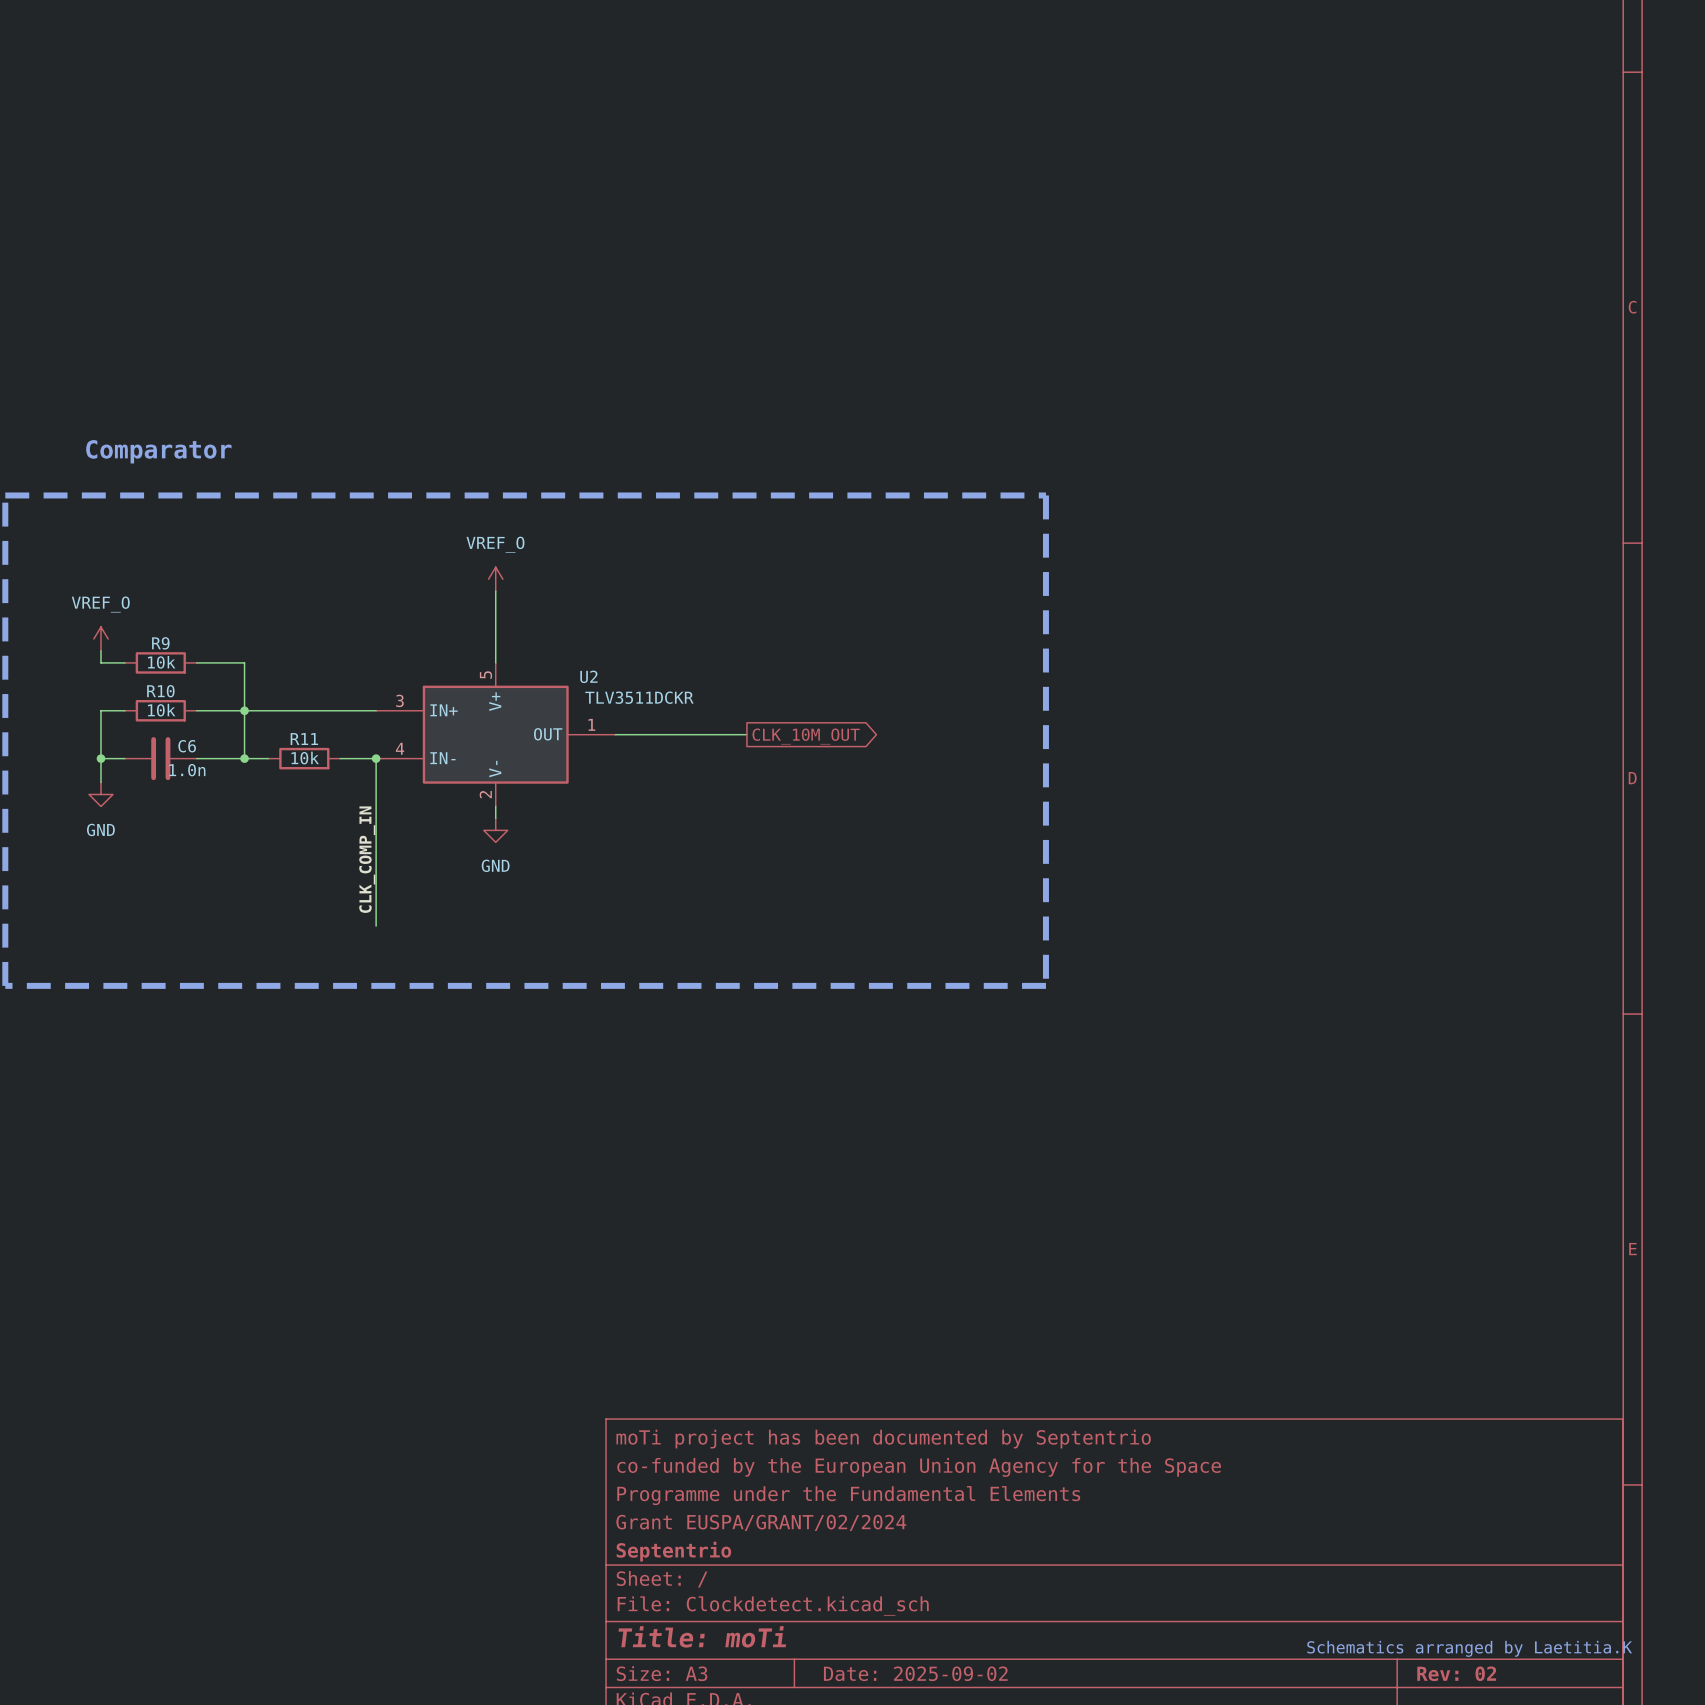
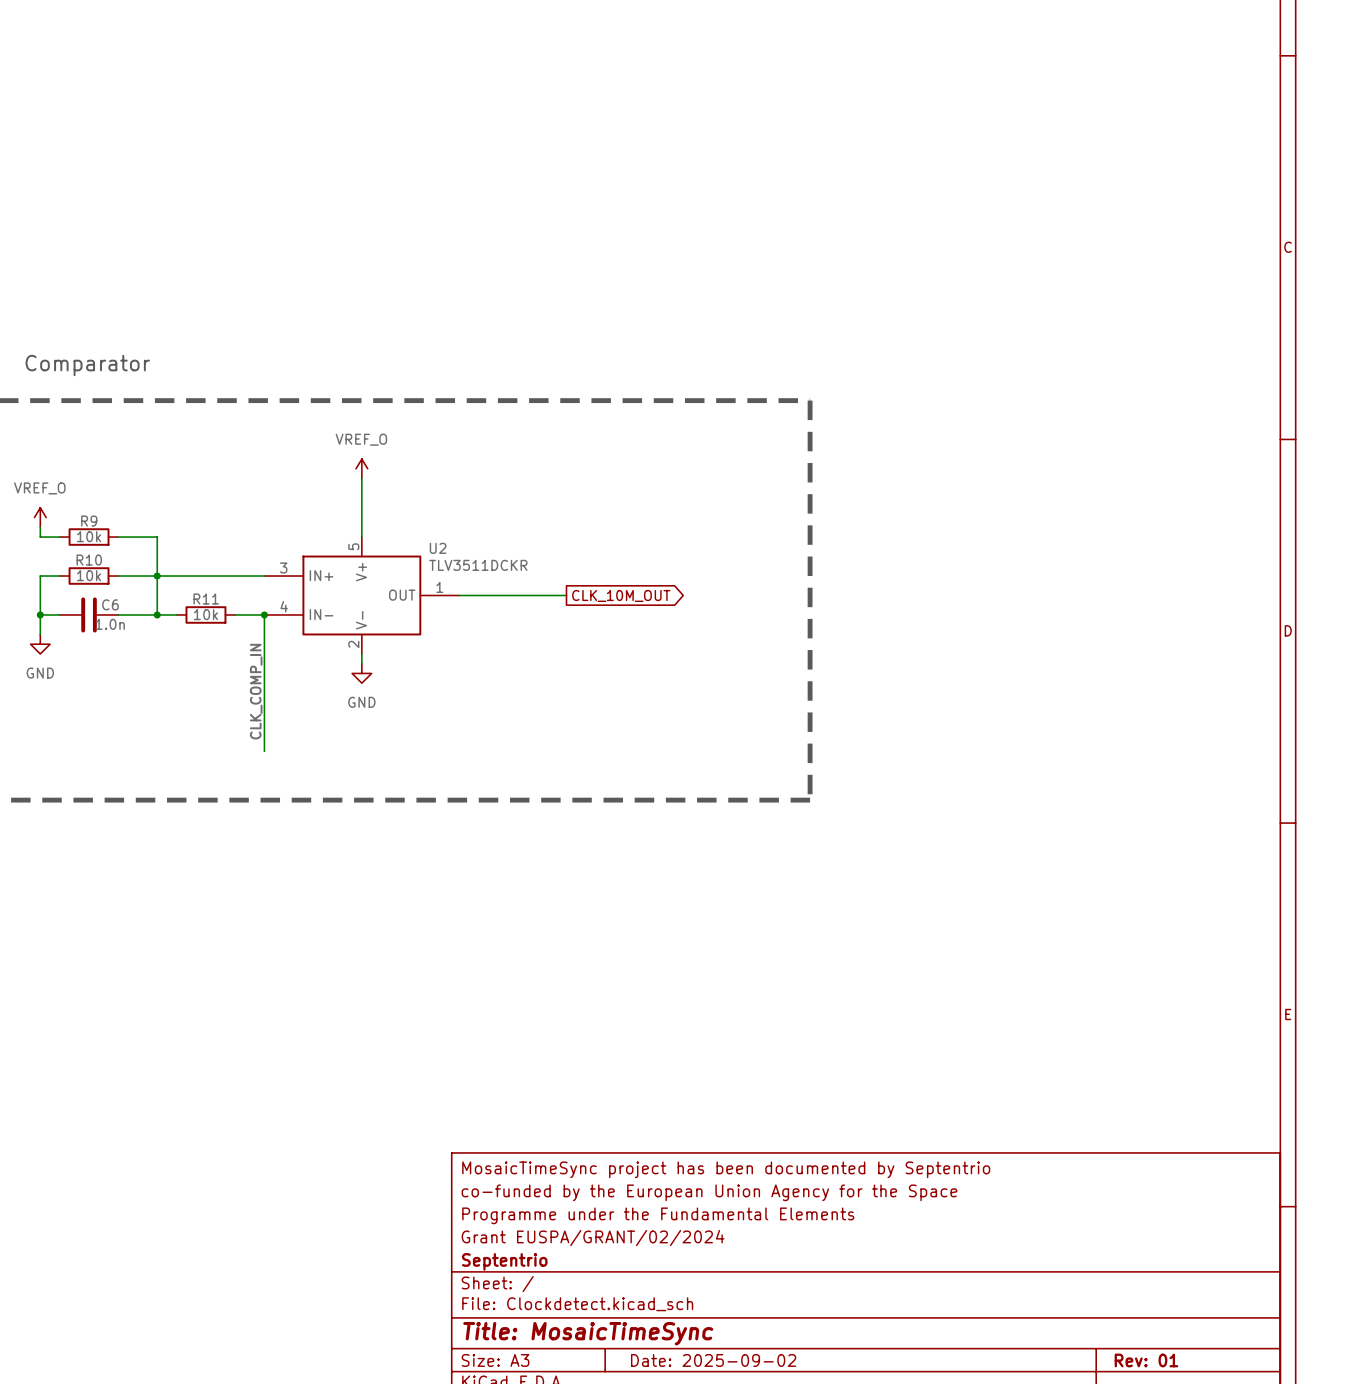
title block: moTi project has been documented by Septentrio (883, 1439) -> MosaicTimeSync project has been documented by Septentrio (726, 1169)
title block: Title: moTi (702, 1636) -> Title: MosaicTimeSync (588, 1333)
text: Schematics arranged by Laetitia.K (1469, 1648) -> none
title block: Rev: 02 (1456, 1673) -> Rev: 01 (1146, 1360)

